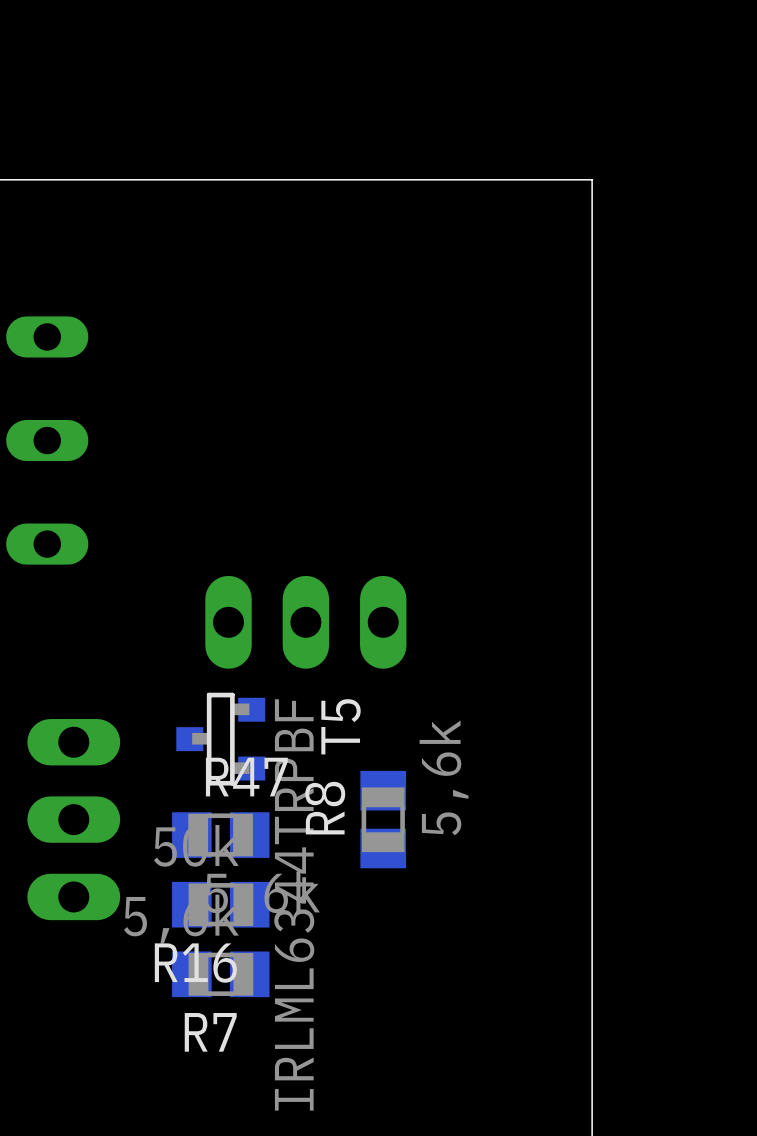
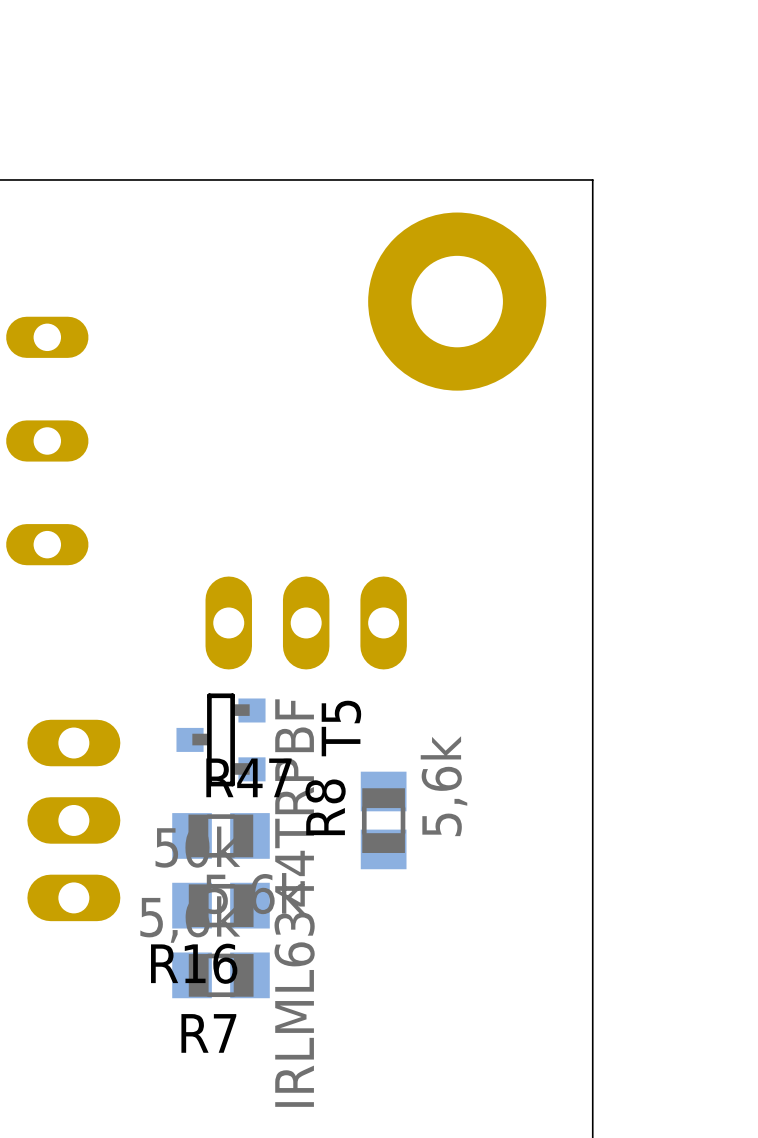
part: none -> (457, 301)

